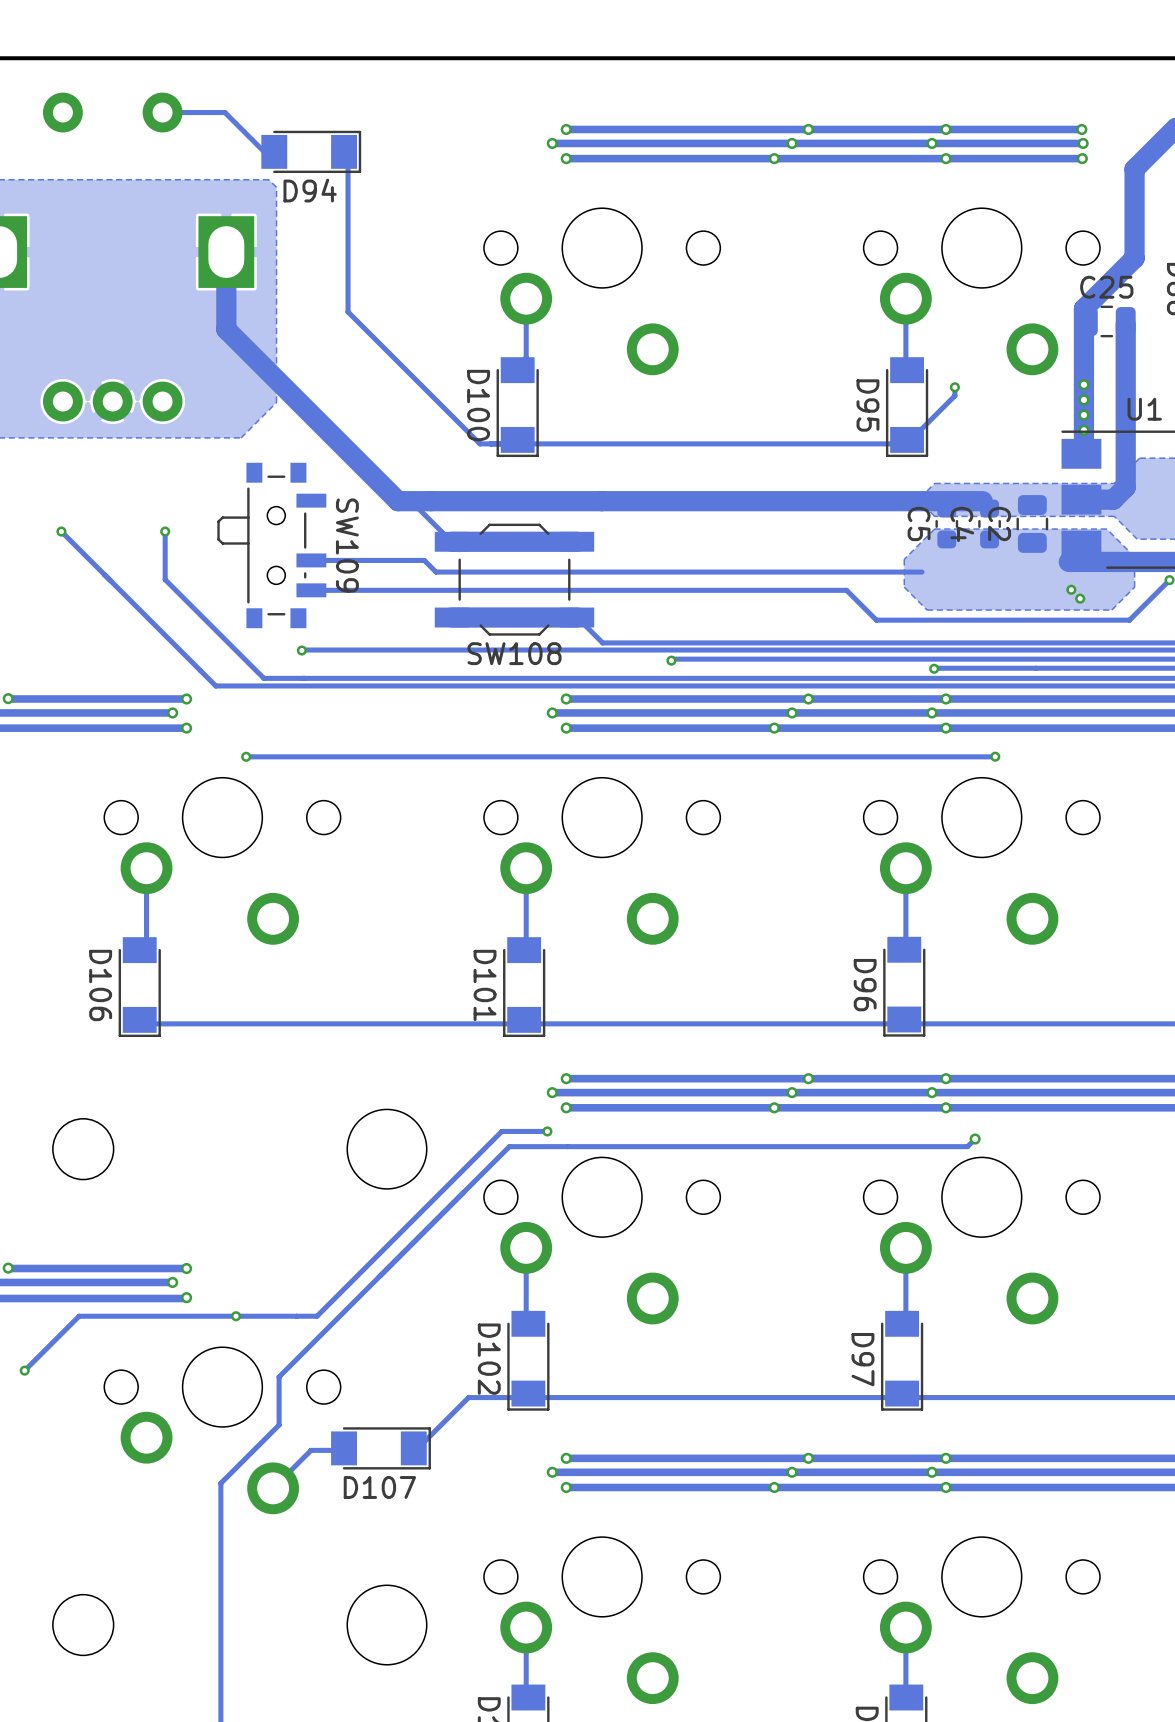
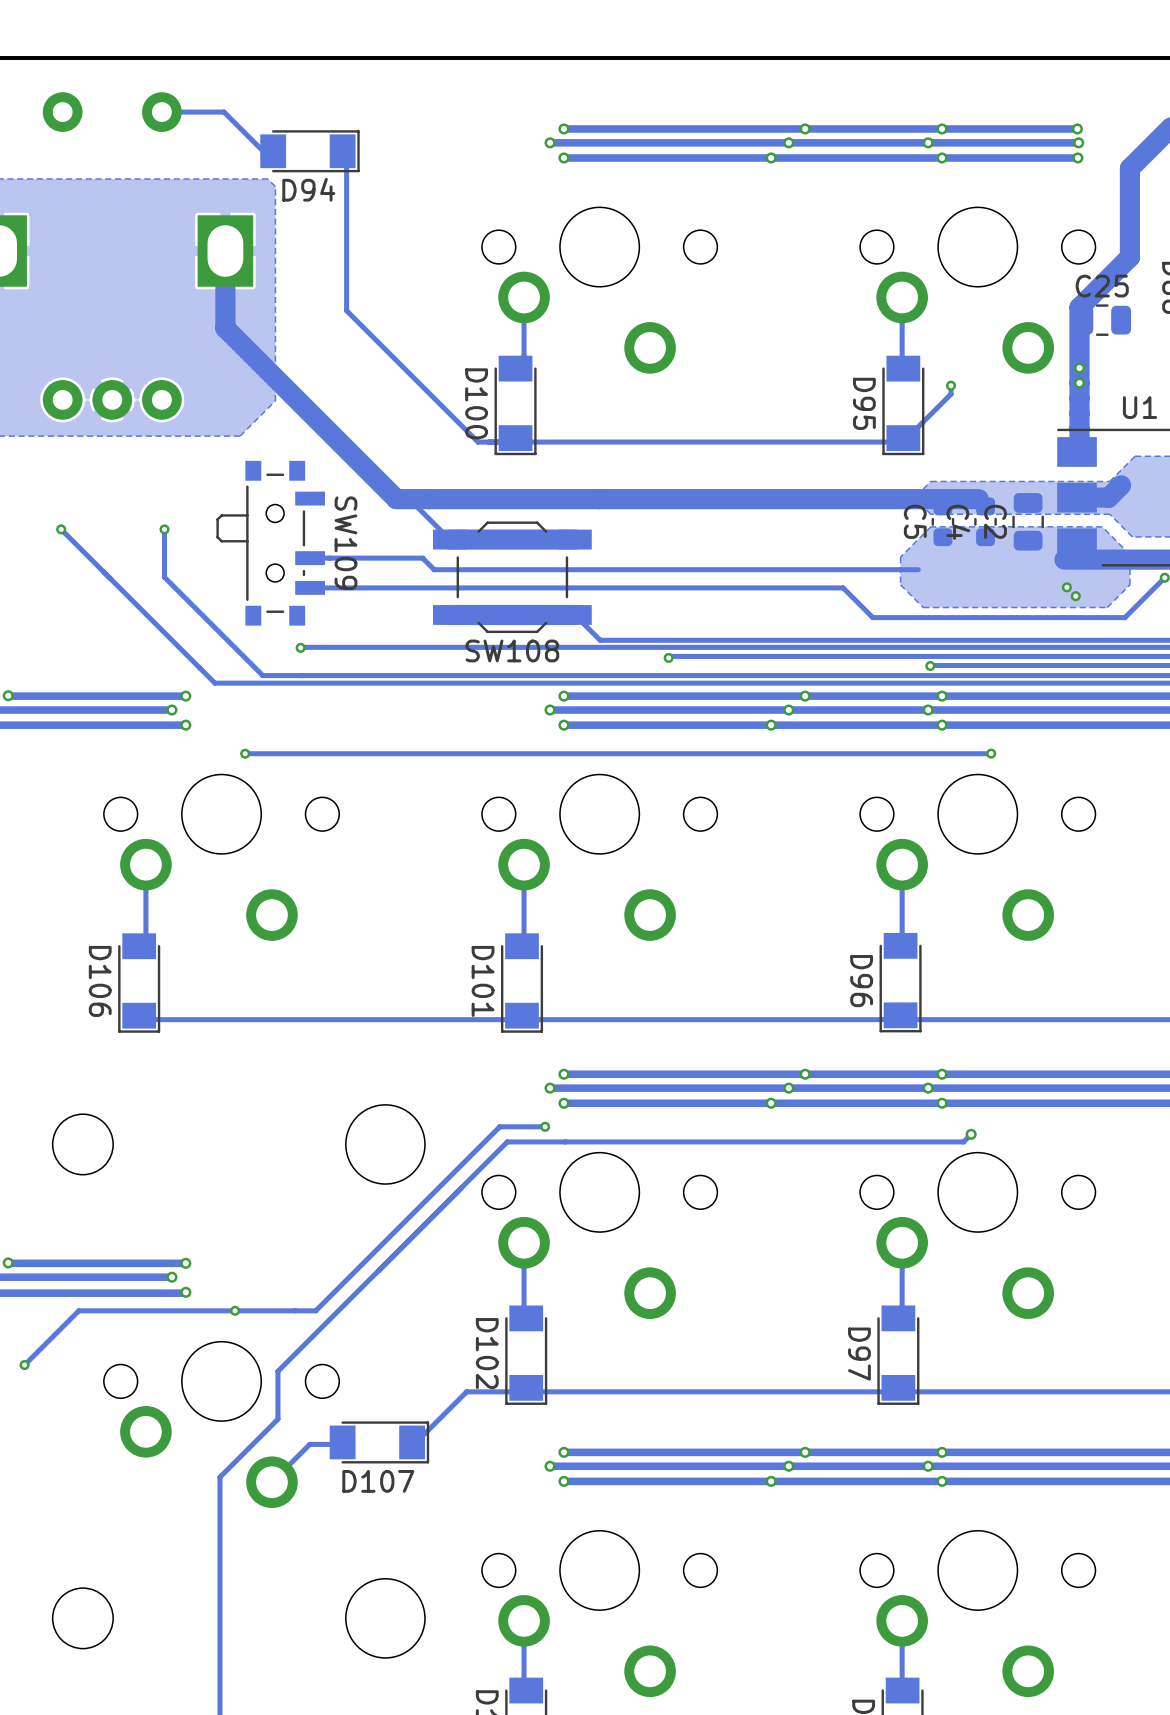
track: (1125, 324) (1125, 487) -> none
via: none -> (1079, 368)
via: (1083, 399) -> none
via: (1083, 415) -> none
via: (1083, 430) -> none

